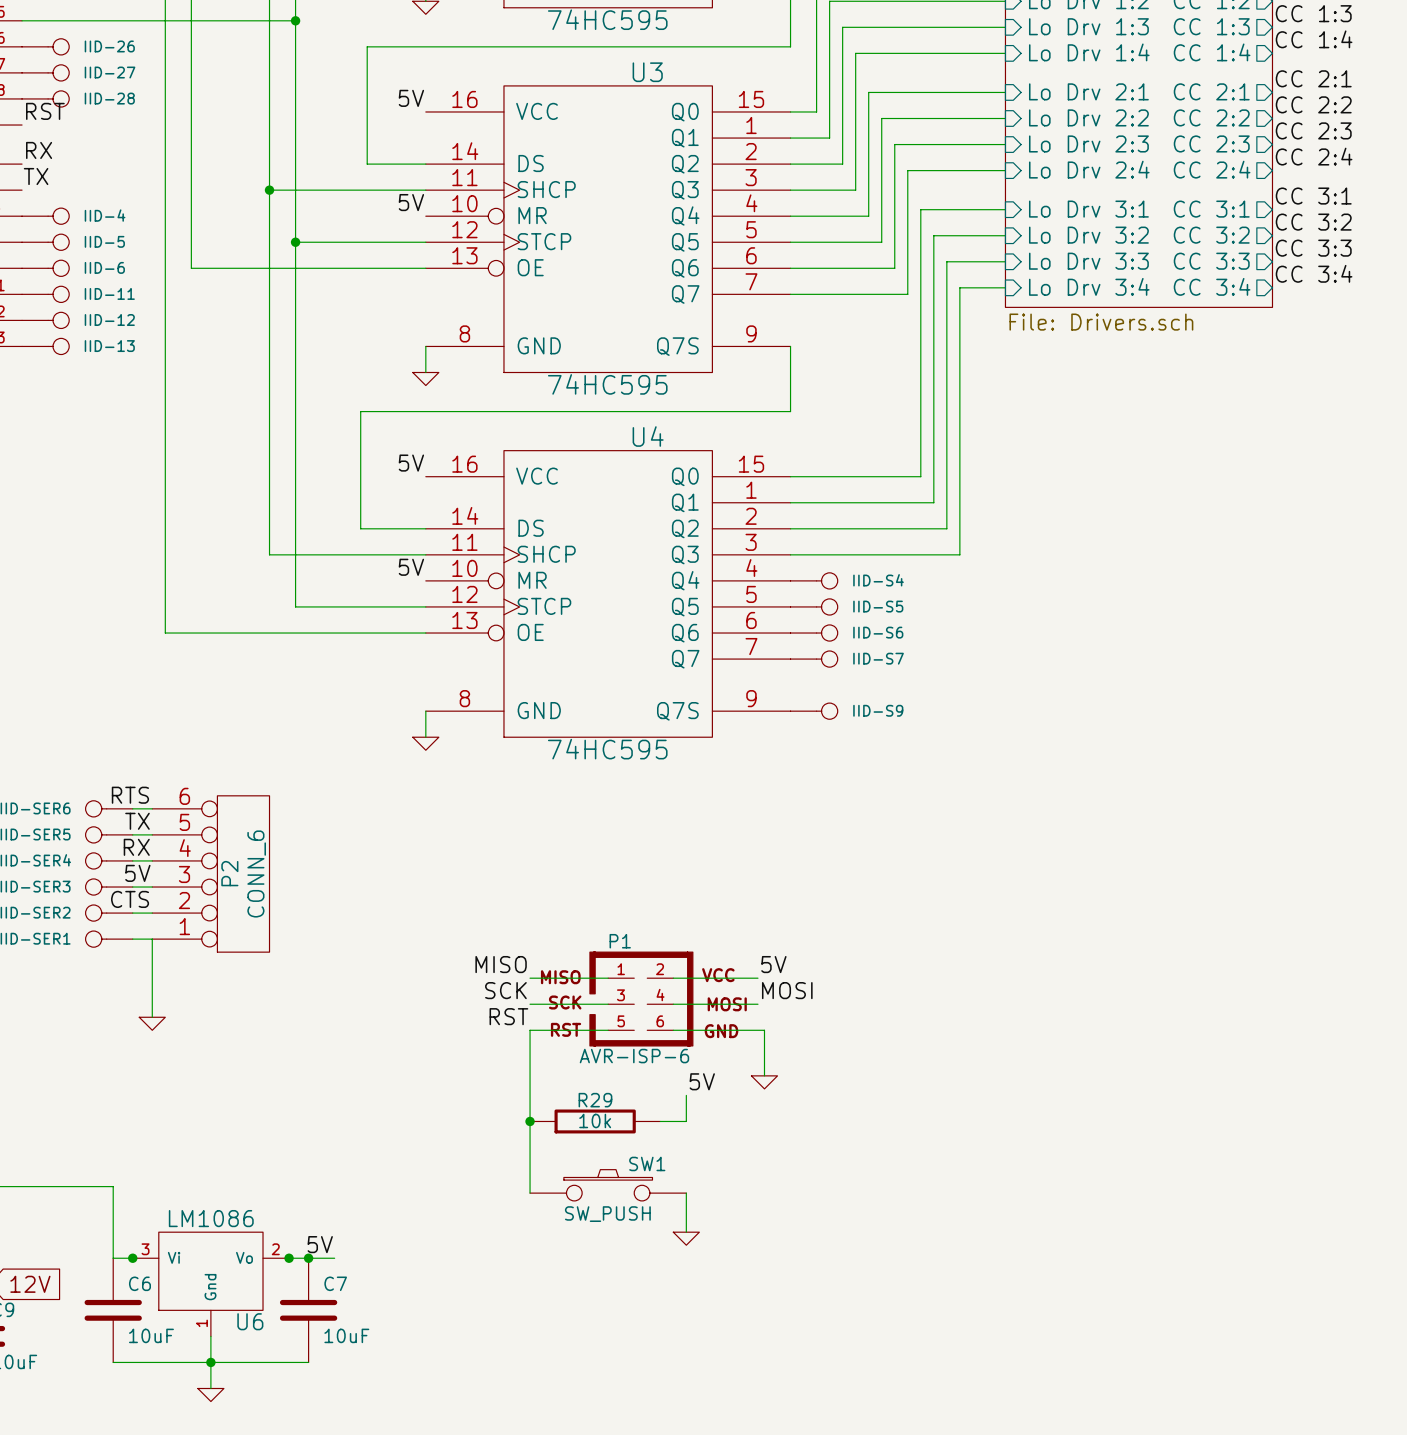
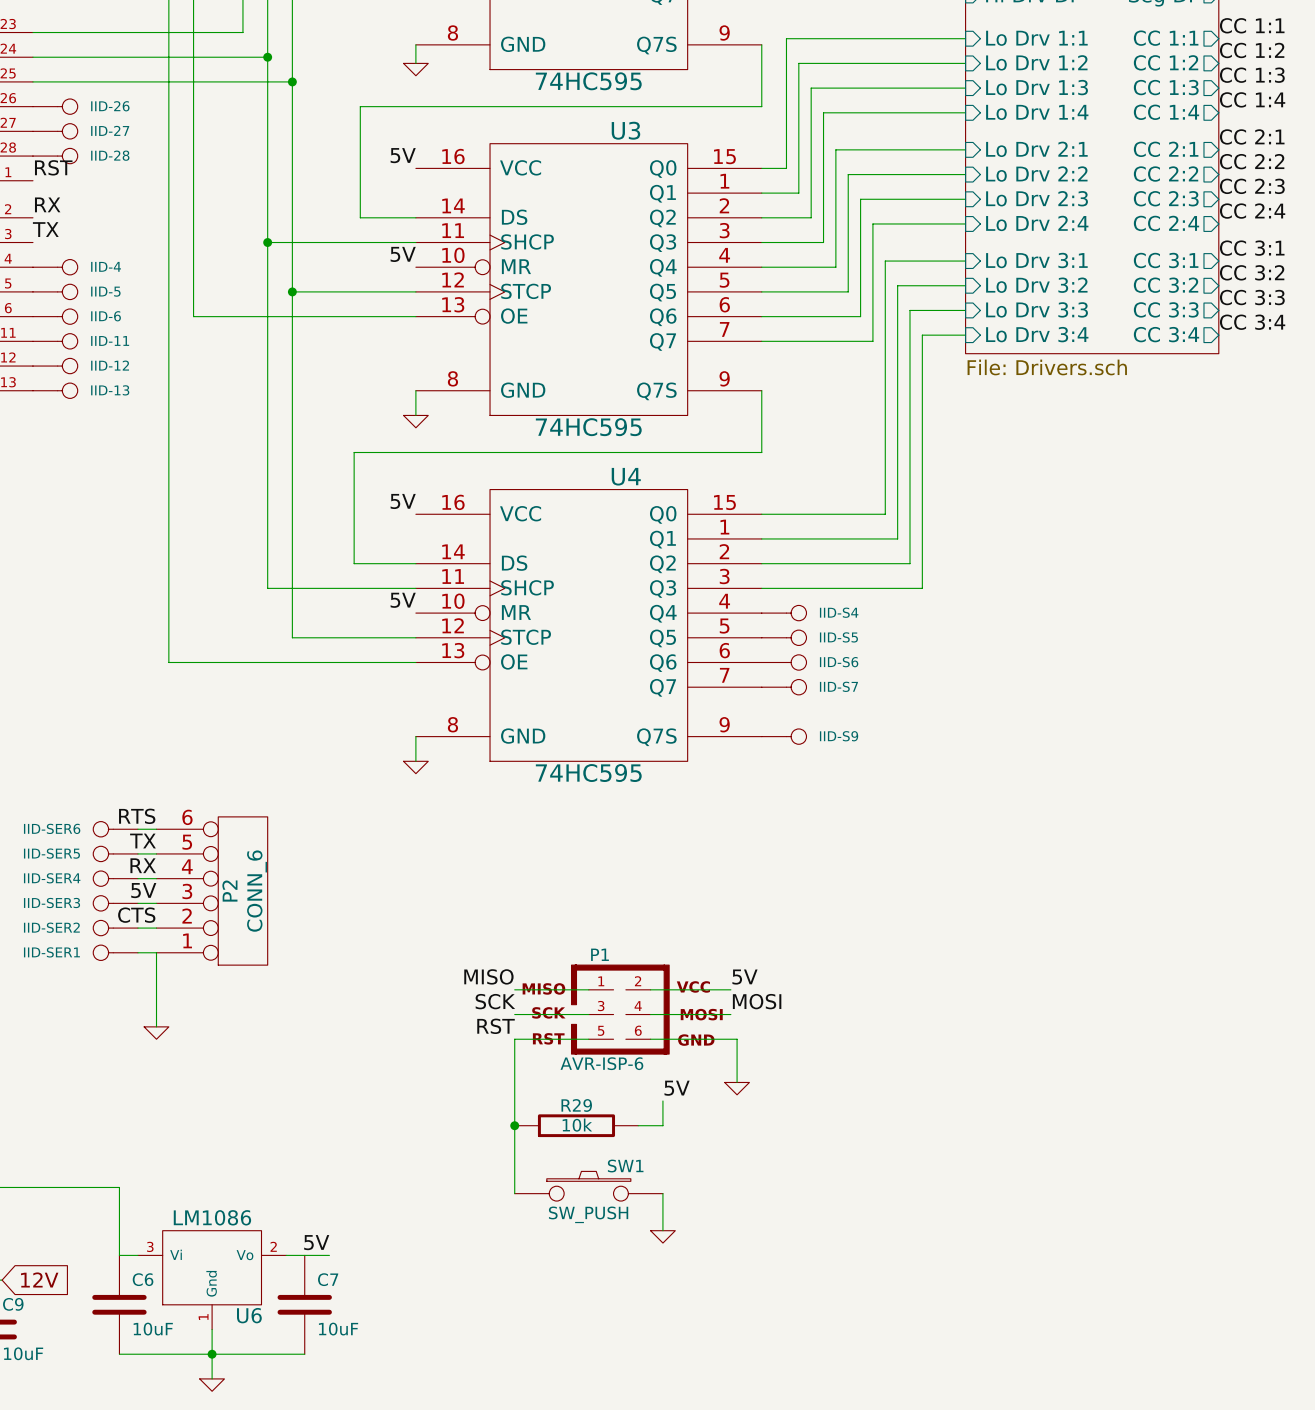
junction: (132, 1258) -> none
junction: (289, 1258) -> none
junction: (308, 1258) -> none

